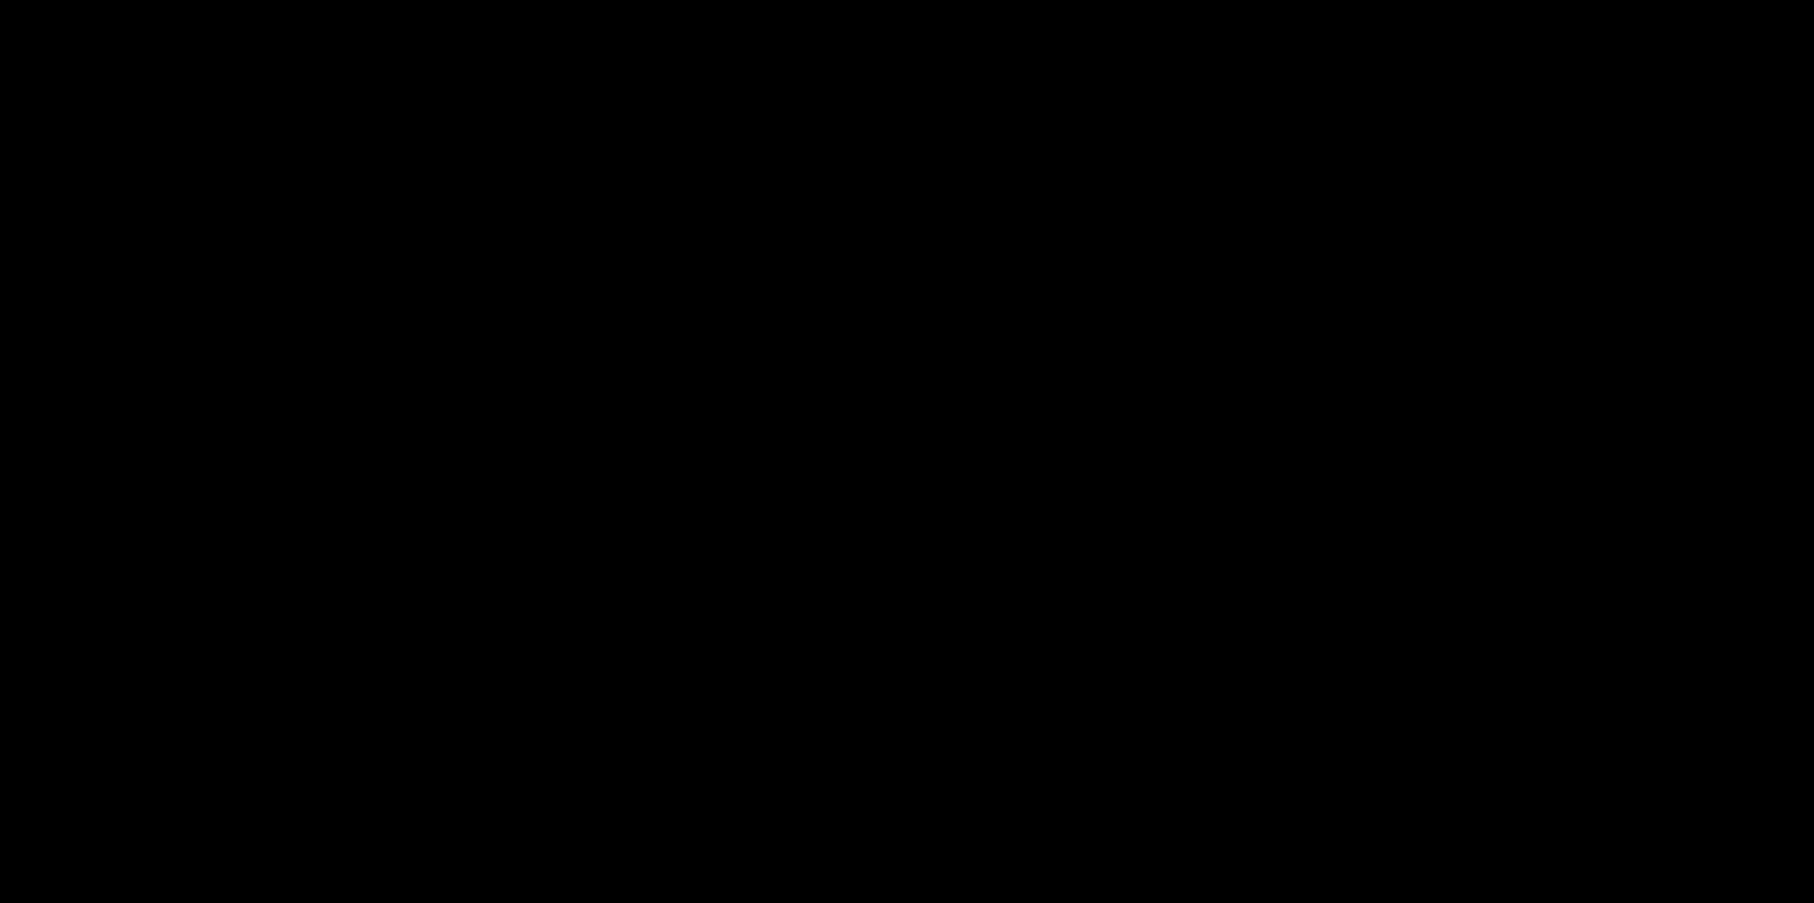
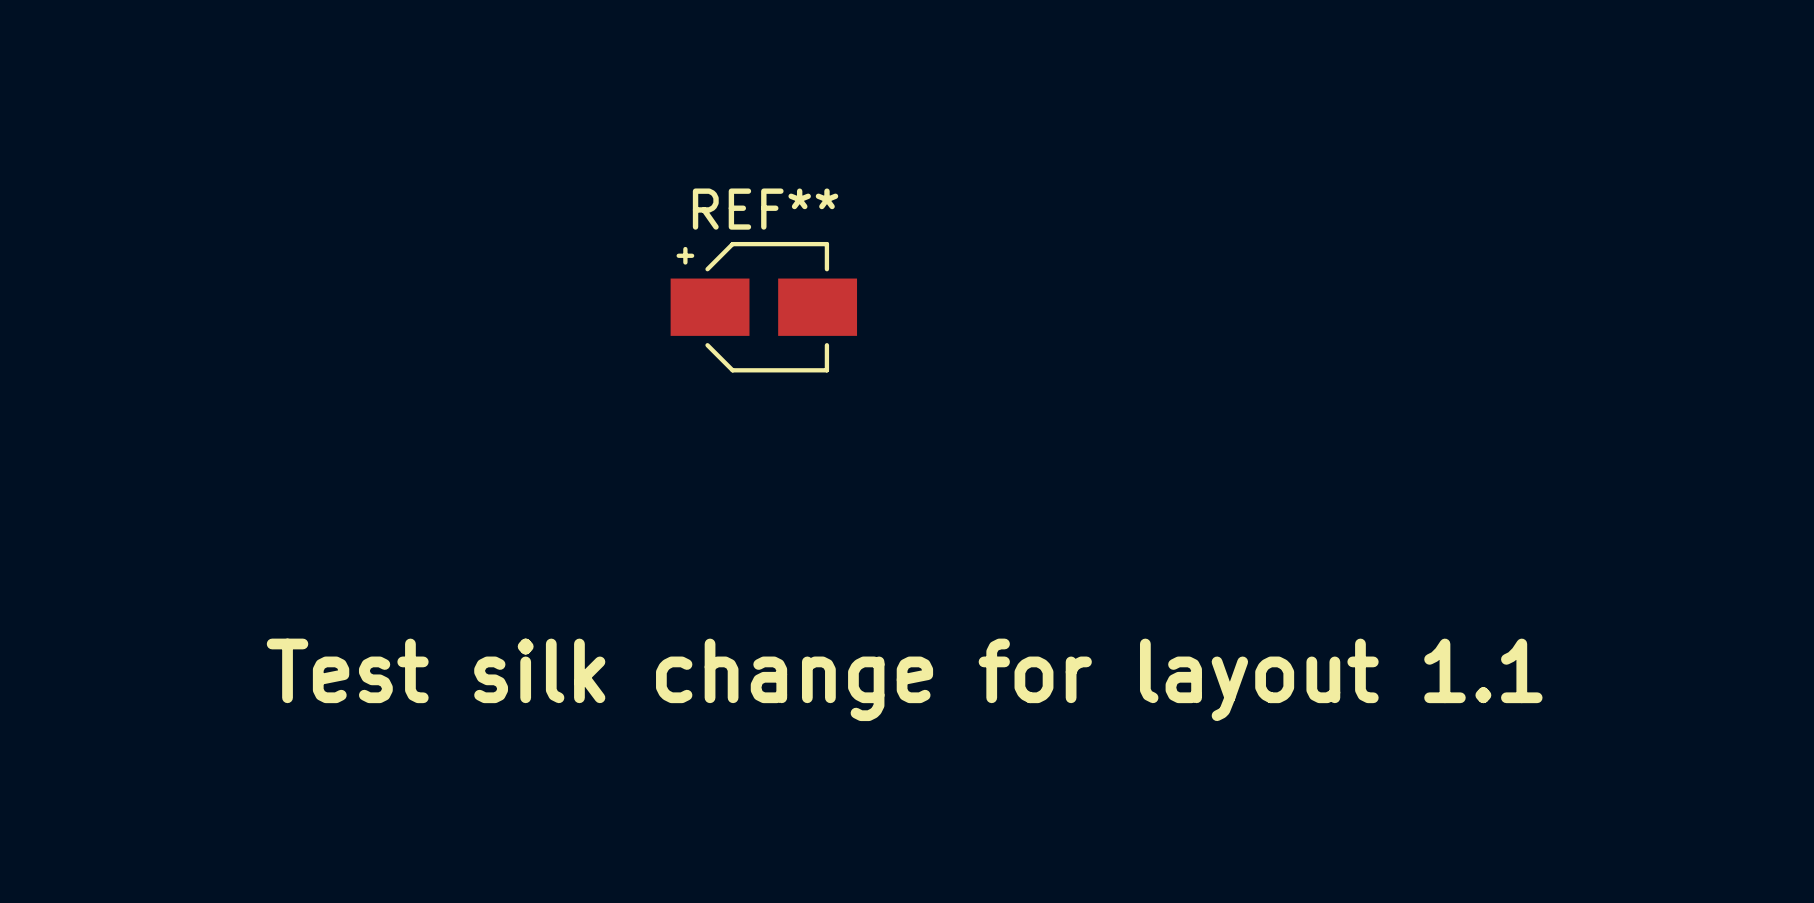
REF**: none -> (763, 307)
text: none -> Test silk change for layout 1.1 (904, 679)

